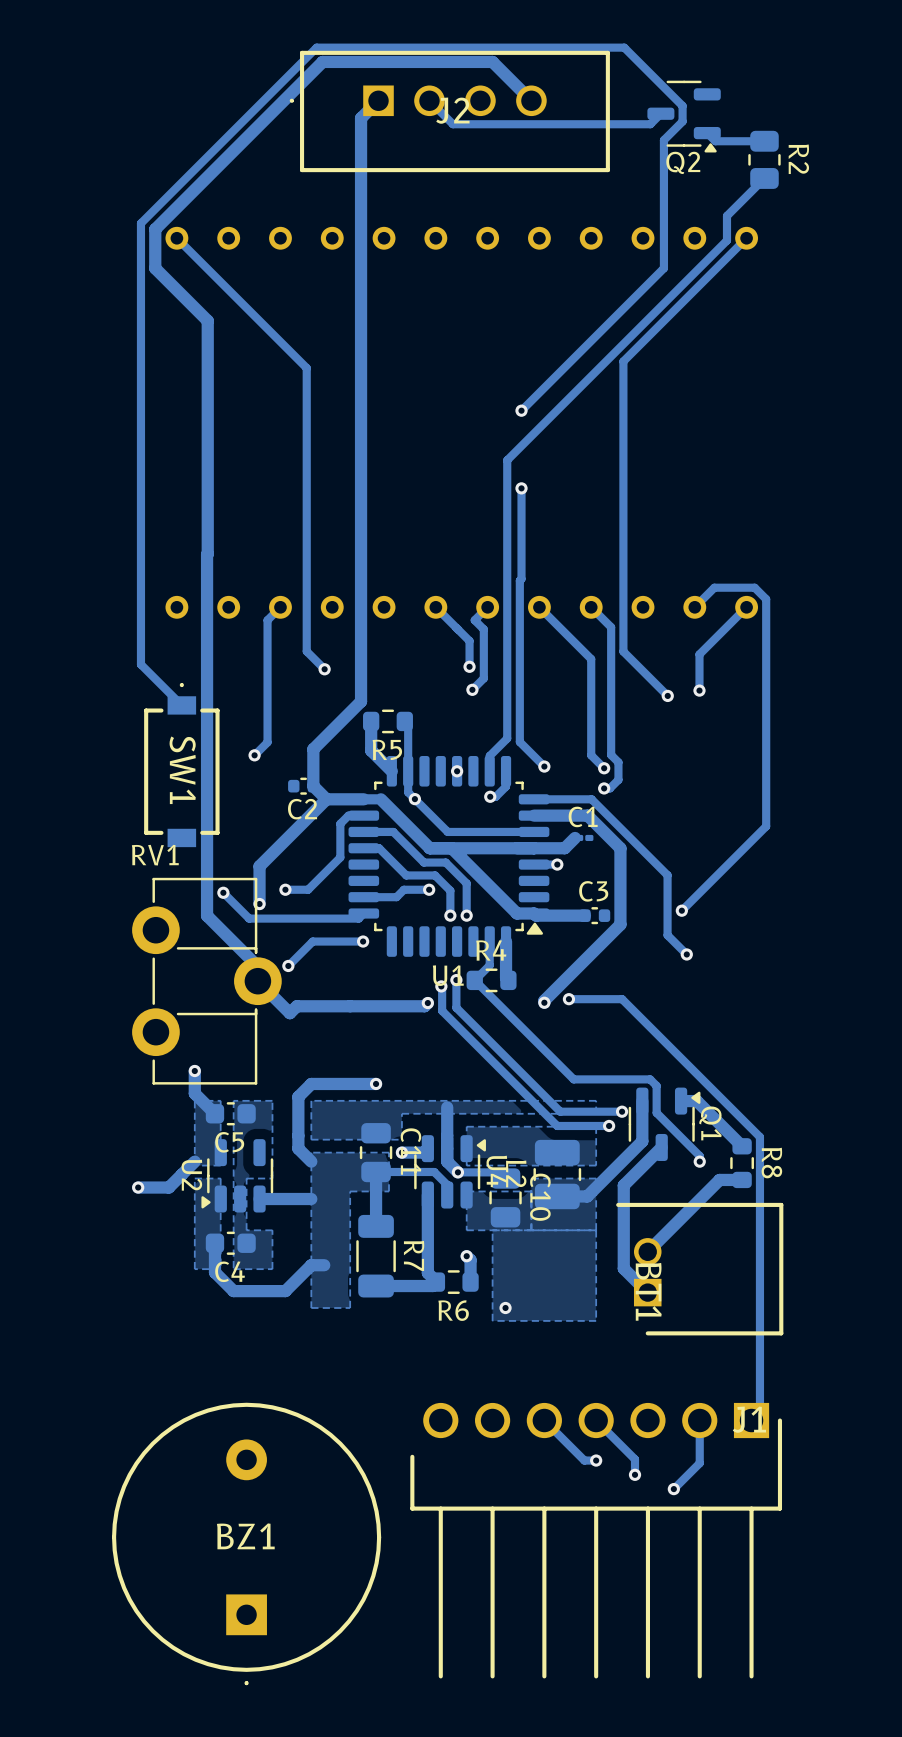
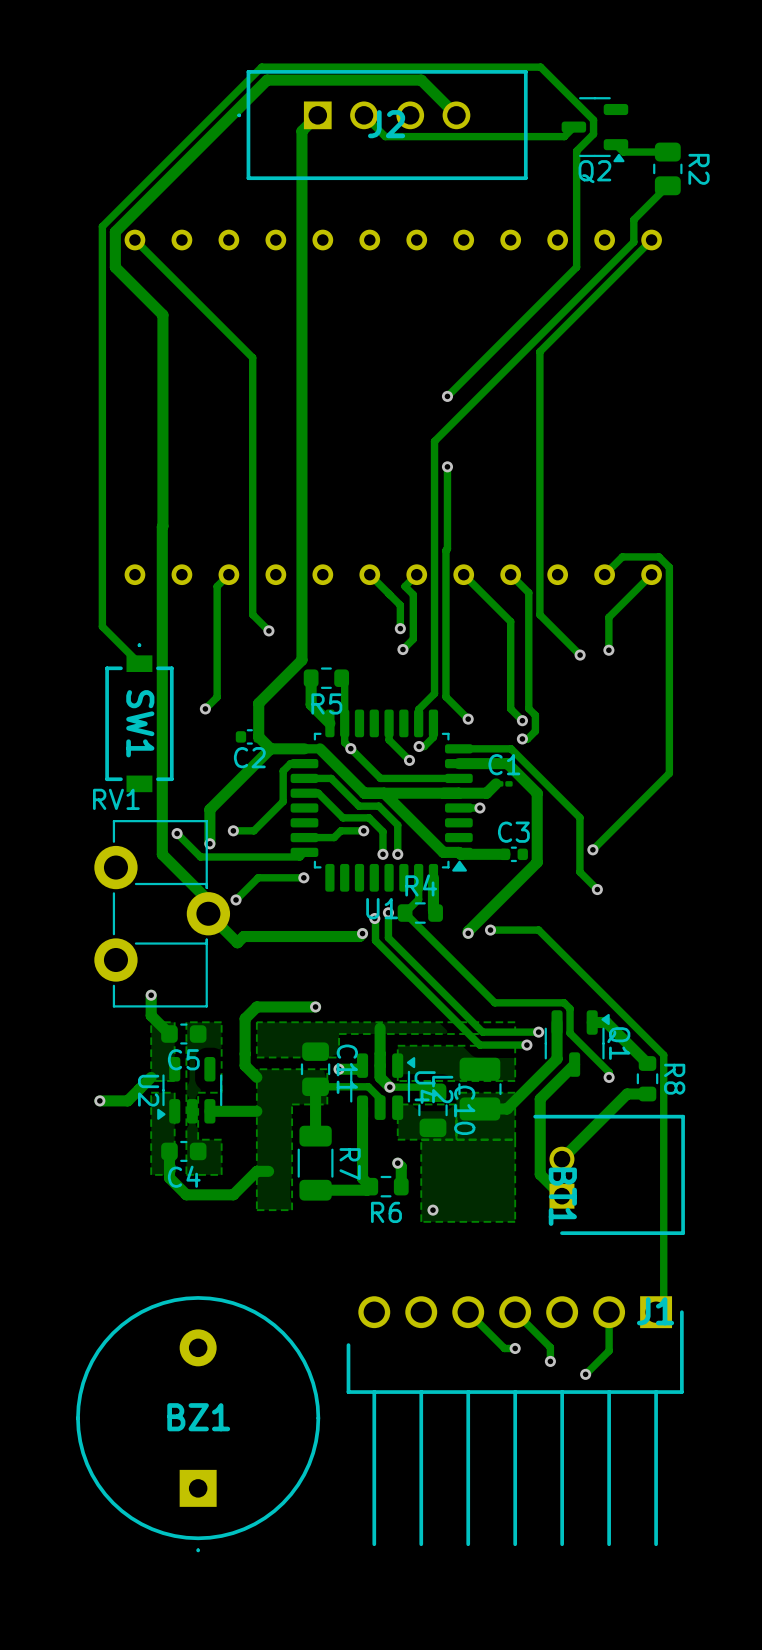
track: none -> (389, 723) (389, 739) (409, 760)
via position: (457, 771) -> (409, 760)

